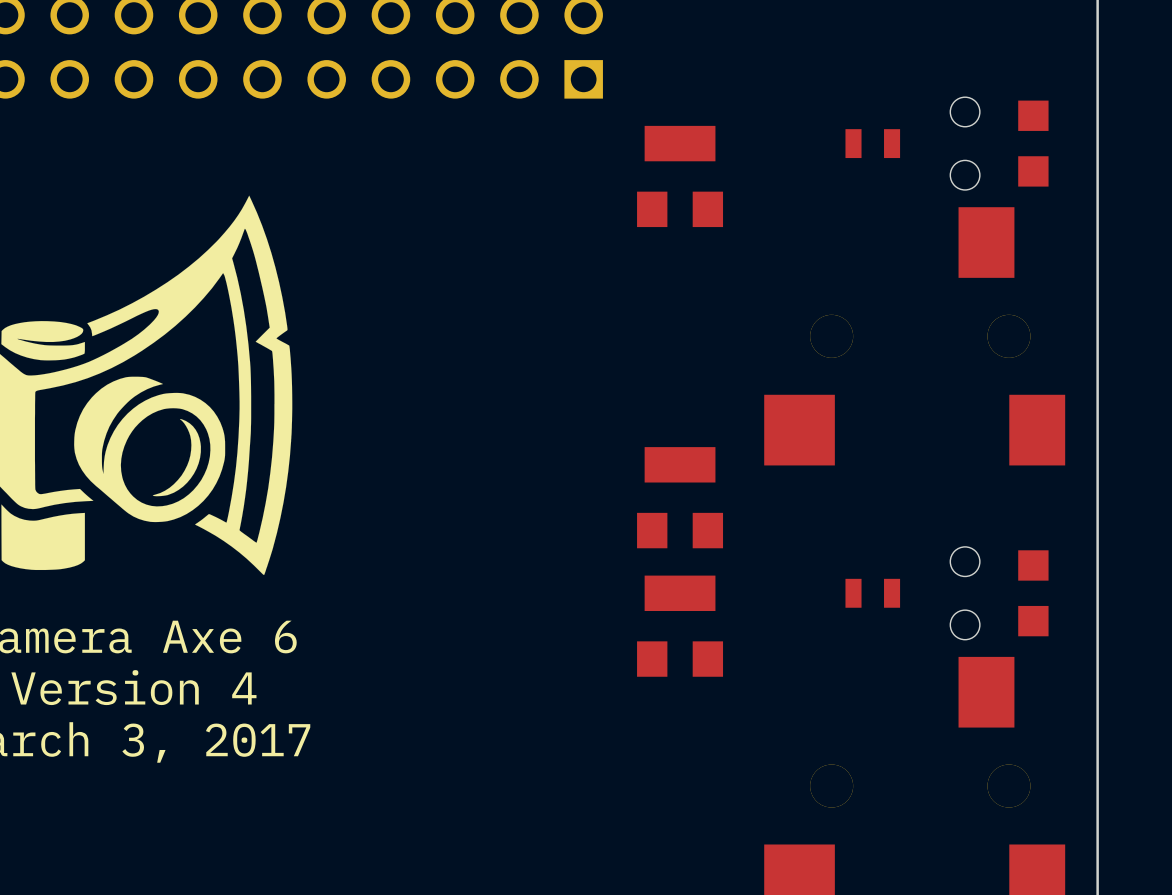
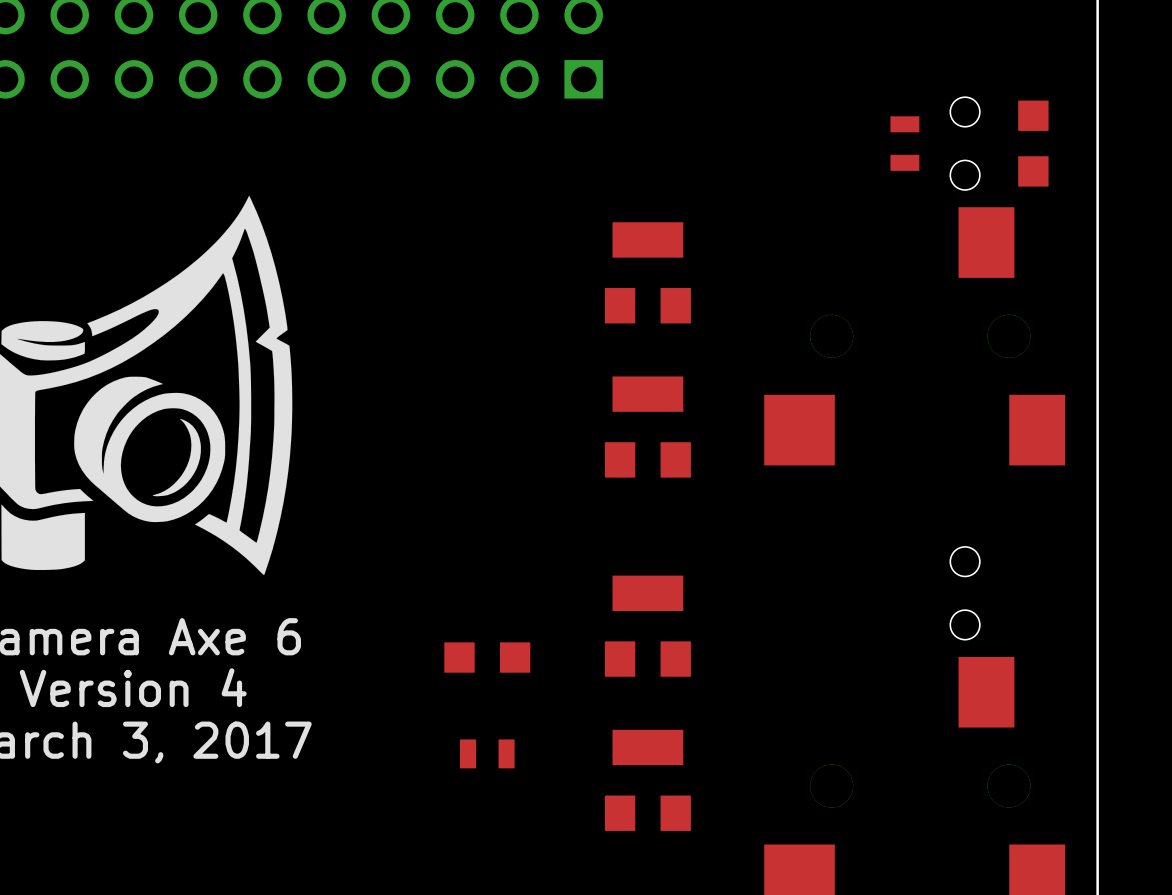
part rotation: 0° (872, 143) -> 90° clockwise (904, 143)
part position: (680, 176) -> (647, 272)
part: none -> (647, 427)
part: (680, 497) -> none
part: (872, 593) -> none
part rotation: 0° (1033, 593) -> 90° clockwise (487, 657)
part position: (1033, 593) -> (487, 657)
part position: (680, 626) -> (647, 626)
part: none -> (487, 753)
part: none -> (647, 780)

